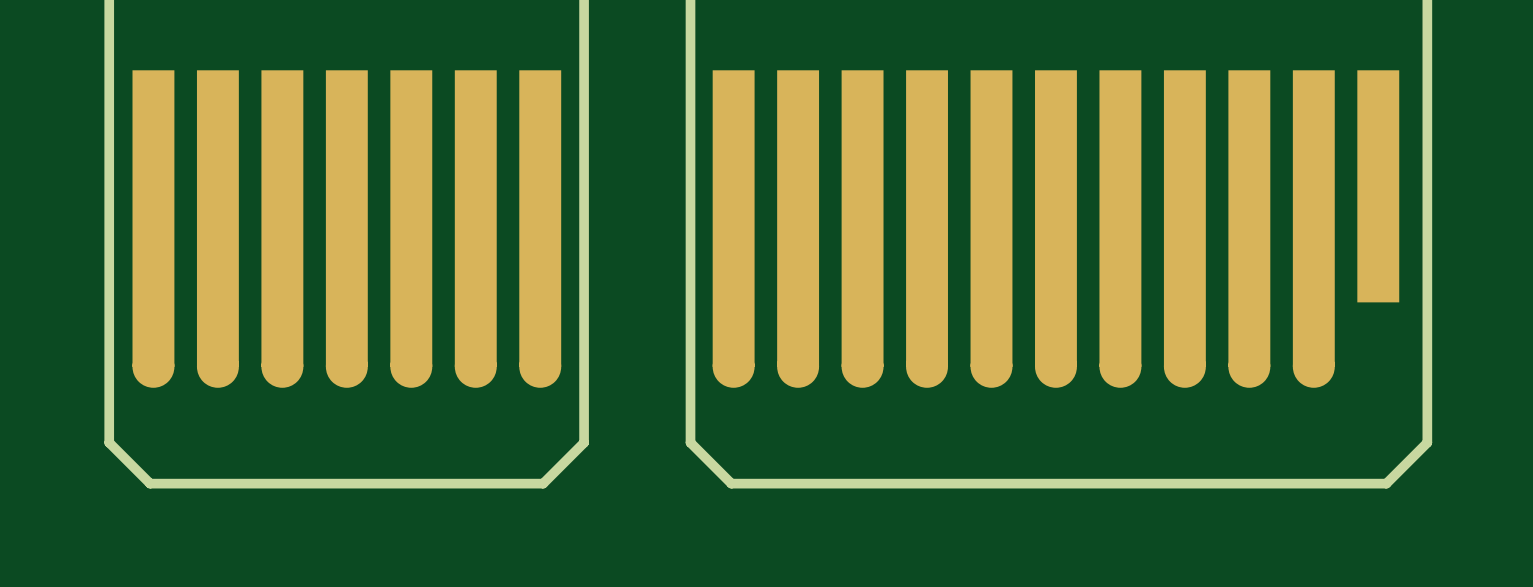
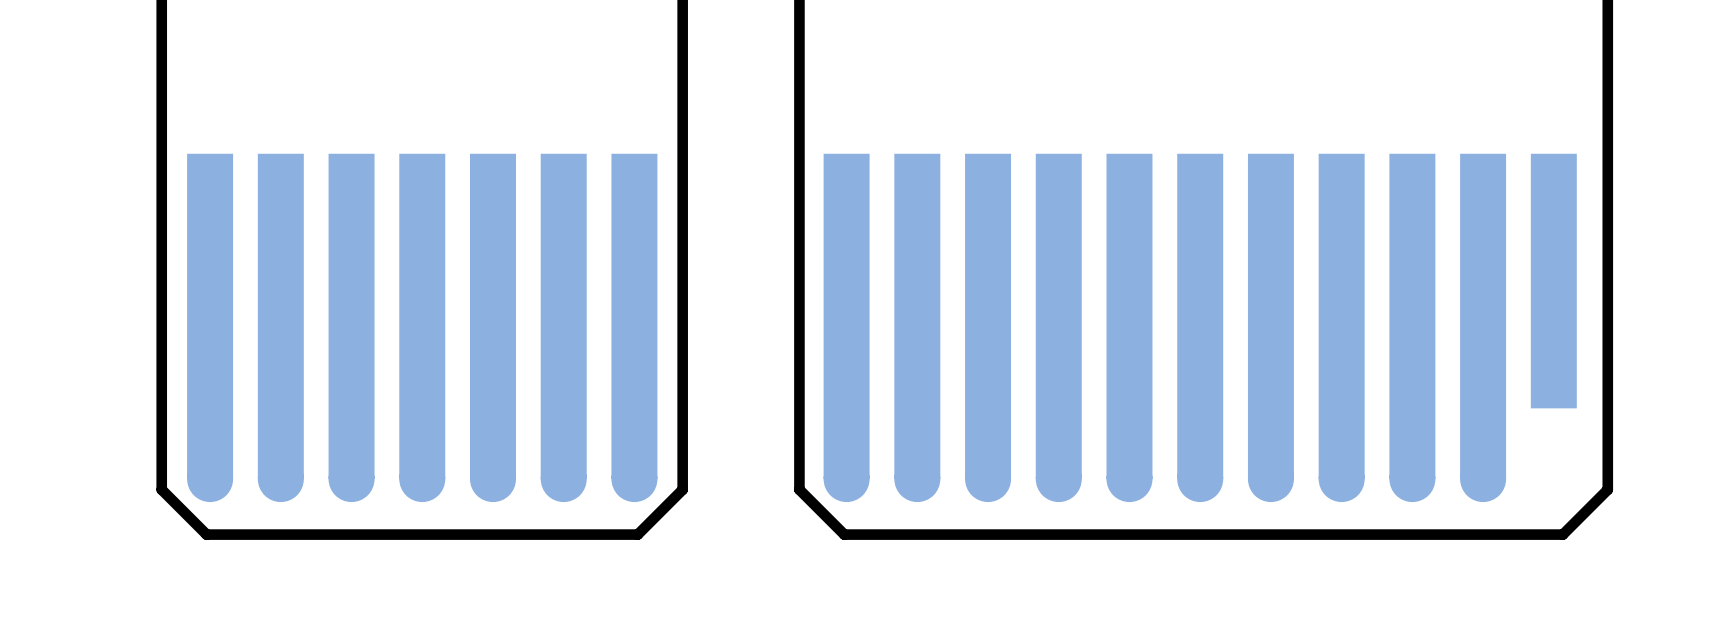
part position: (765, 229) -> (881, 327)

